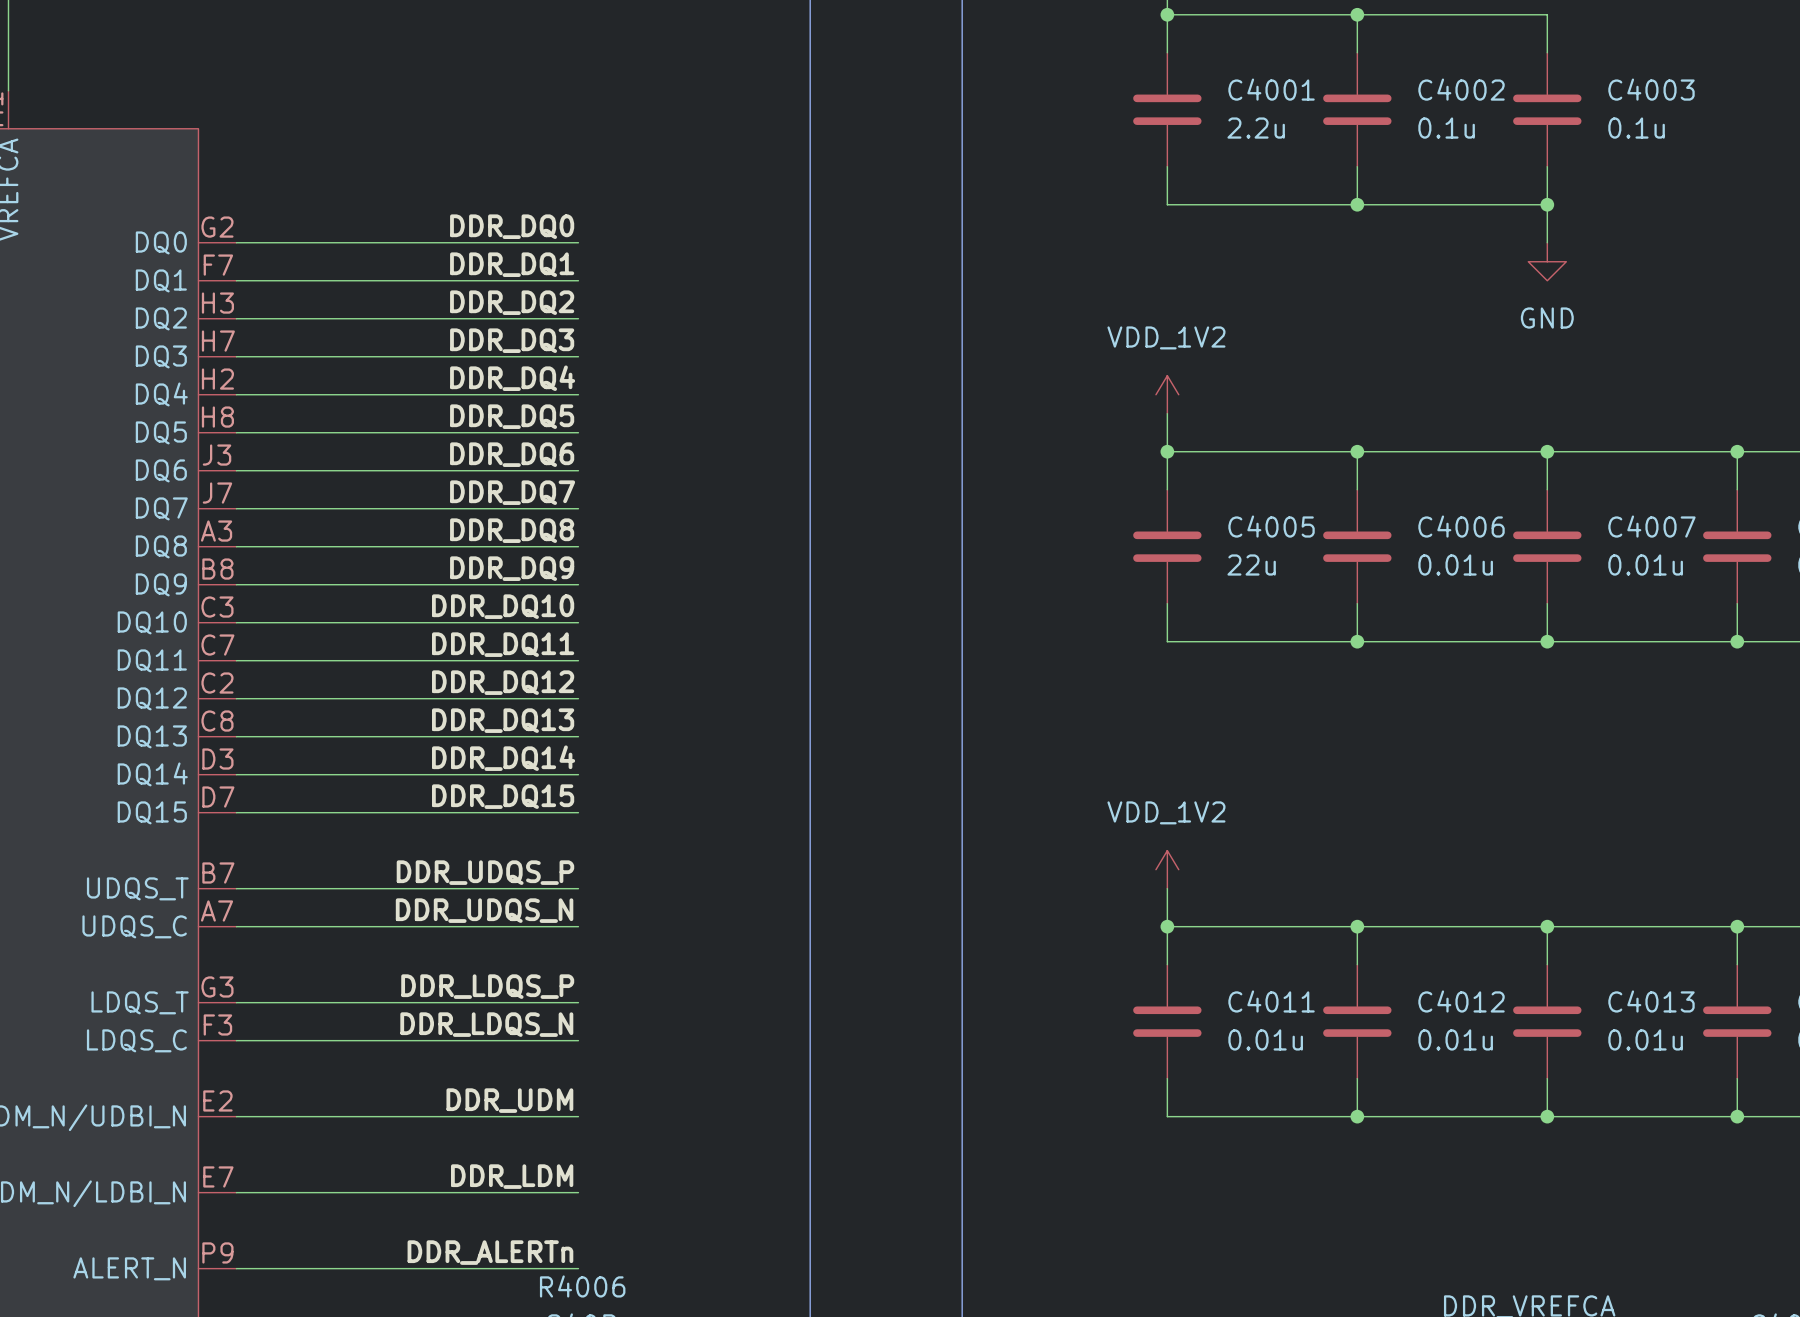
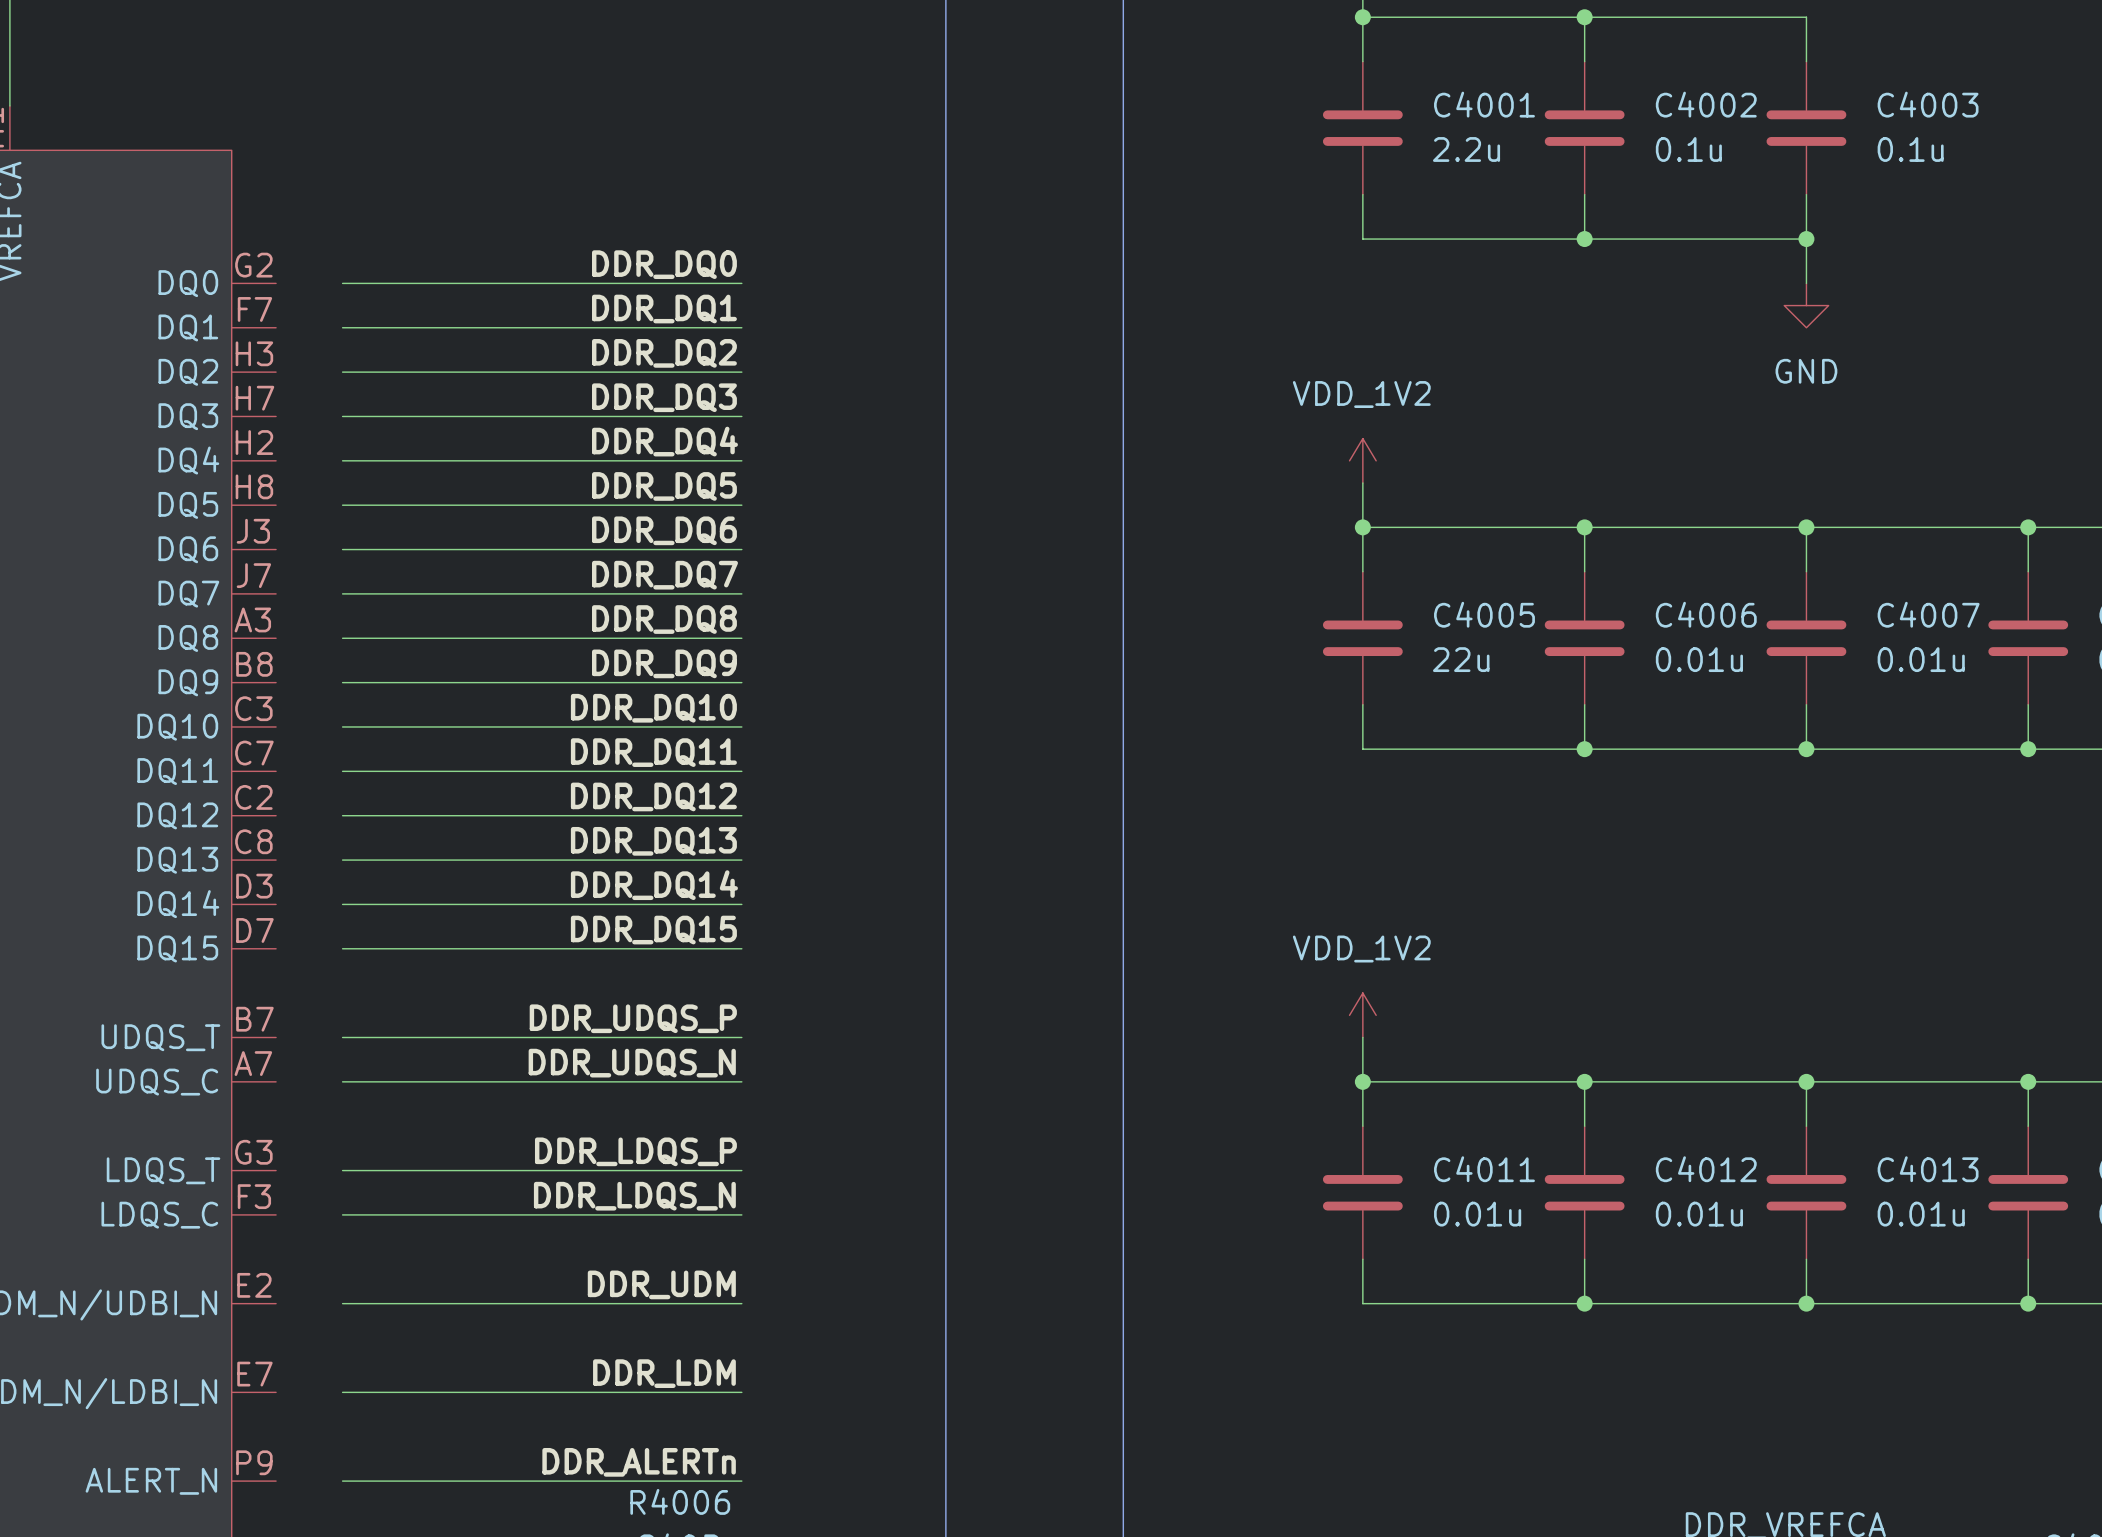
label position: DDR_DQ0 (512, 226) -> DDR_DQ0 (664, 264)
wire: (236, 242) (293, 242) -> (675, 283) (741, 283)
label position: DDR_DQ1 (512, 264) -> DDR_DQ1 (664, 309)
wire: (236, 280) (293, 280) -> (675, 327) (741, 327)
label position: DDR_DQ2 (512, 302) -> DDR_DQ2 (664, 353)
wire: (236, 318) (293, 318) -> (675, 372) (741, 372)
label position: DDR_DQ3 (512, 340) -> DDR_DQ3 (664, 397)
wire: (236, 356) (293, 356) -> (675, 416) (741, 416)
label position: DDR_DQ4 (512, 378) -> DDR_DQ4 (664, 441)
wire: (236, 394) (293, 394) -> (675, 460) (741, 460)
label position: DDR_DQ5 (512, 416) -> DDR_DQ5 (664, 486)
wire: (236, 432) (293, 432) -> (675, 505) (741, 505)
label position: DDR_DQ6 (512, 454) -> DDR_DQ6 (664, 530)
wire: (236, 470) (293, 470) -> (675, 549) (741, 549)
label position: DDR_DQ7 (512, 492) -> DDR_DQ7 (664, 575)
wire: (236, 508) (293, 508) -> (675, 593) (741, 593)
label position: DDR_DQ8 (512, 530) -> DDR_DQ8 (664, 619)
wire: (236, 546) (293, 546) -> (675, 638) (741, 638)
label position: DDR_DQ9 (512, 568) -> DDR_DQ9 (664, 663)
wire: (236, 584) (293, 584) -> (675, 682) (741, 682)
label position: DDR_DQ10 (503, 606) -> DDR_DQ10 (653, 708)
wire: (236, 622) (293, 622) -> (675, 726) (741, 726)
label position: DDR_DQ11 (503, 644) -> DDR_DQ11 (653, 752)
wire: (236, 660) (293, 660) -> (675, 771) (741, 771)
label position: DDR_DQ12 (503, 682) -> DDR_DQ12 (653, 796)
wire: (236, 698) (293, 698) -> (675, 815) (741, 815)
label position: DDR_DQ13 (503, 720) -> DDR_DQ13 (653, 841)
wire: (236, 736) (293, 736) -> (675, 860) (741, 860)
label position: DDR_DQ14 (503, 758) -> DDR_DQ14 (654, 885)
wire: (236, 774) (293, 774) -> (675, 904) (741, 904)
label position: DDR_DQ15 (503, 796) -> DDR_DQ15 (653, 930)
wire: (236, 812) (293, 812) -> (675, 948) (741, 948)
label position: DDR_UDQS_P (485, 872) -> DDR_UDQS_P (633, 1018)
wire: (236, 888) (293, 888) -> (675, 1037) (741, 1037)
label position: DDR_UDQS_N (484, 910) -> DDR_UDQS_N (632, 1063)
wire: (236, 926) (293, 926) -> (675, 1081) (741, 1081)
label position: DDR_LDQS_P (487, 986) -> DDR_LDQS_P (635, 1151)
wire: (236, 1002) (293, 1002) -> (675, 1170) (741, 1170)
label position: DDR_LDQS_N (486, 1024) -> DDR_LDQS_N (634, 1196)
wire: (236, 1040) (293, 1040) -> (675, 1214) (741, 1214)
label position: DDR_UDM (509, 1100) -> DDR_UDM (661, 1284)
wire: (236, 1116) (293, 1116) -> (675, 1303) (741, 1303)
label position: DDR_LDM (512, 1176) -> DDR_LDM (664, 1373)
wire: (236, 1192) (293, 1192) -> (675, 1392) (741, 1392)
label position: DDR_ALERTn (490, 1252) -> DDR_ALERTn (639, 1462)
wire: (236, 1268) (293, 1268) -> (675, 1481) (741, 1481)

